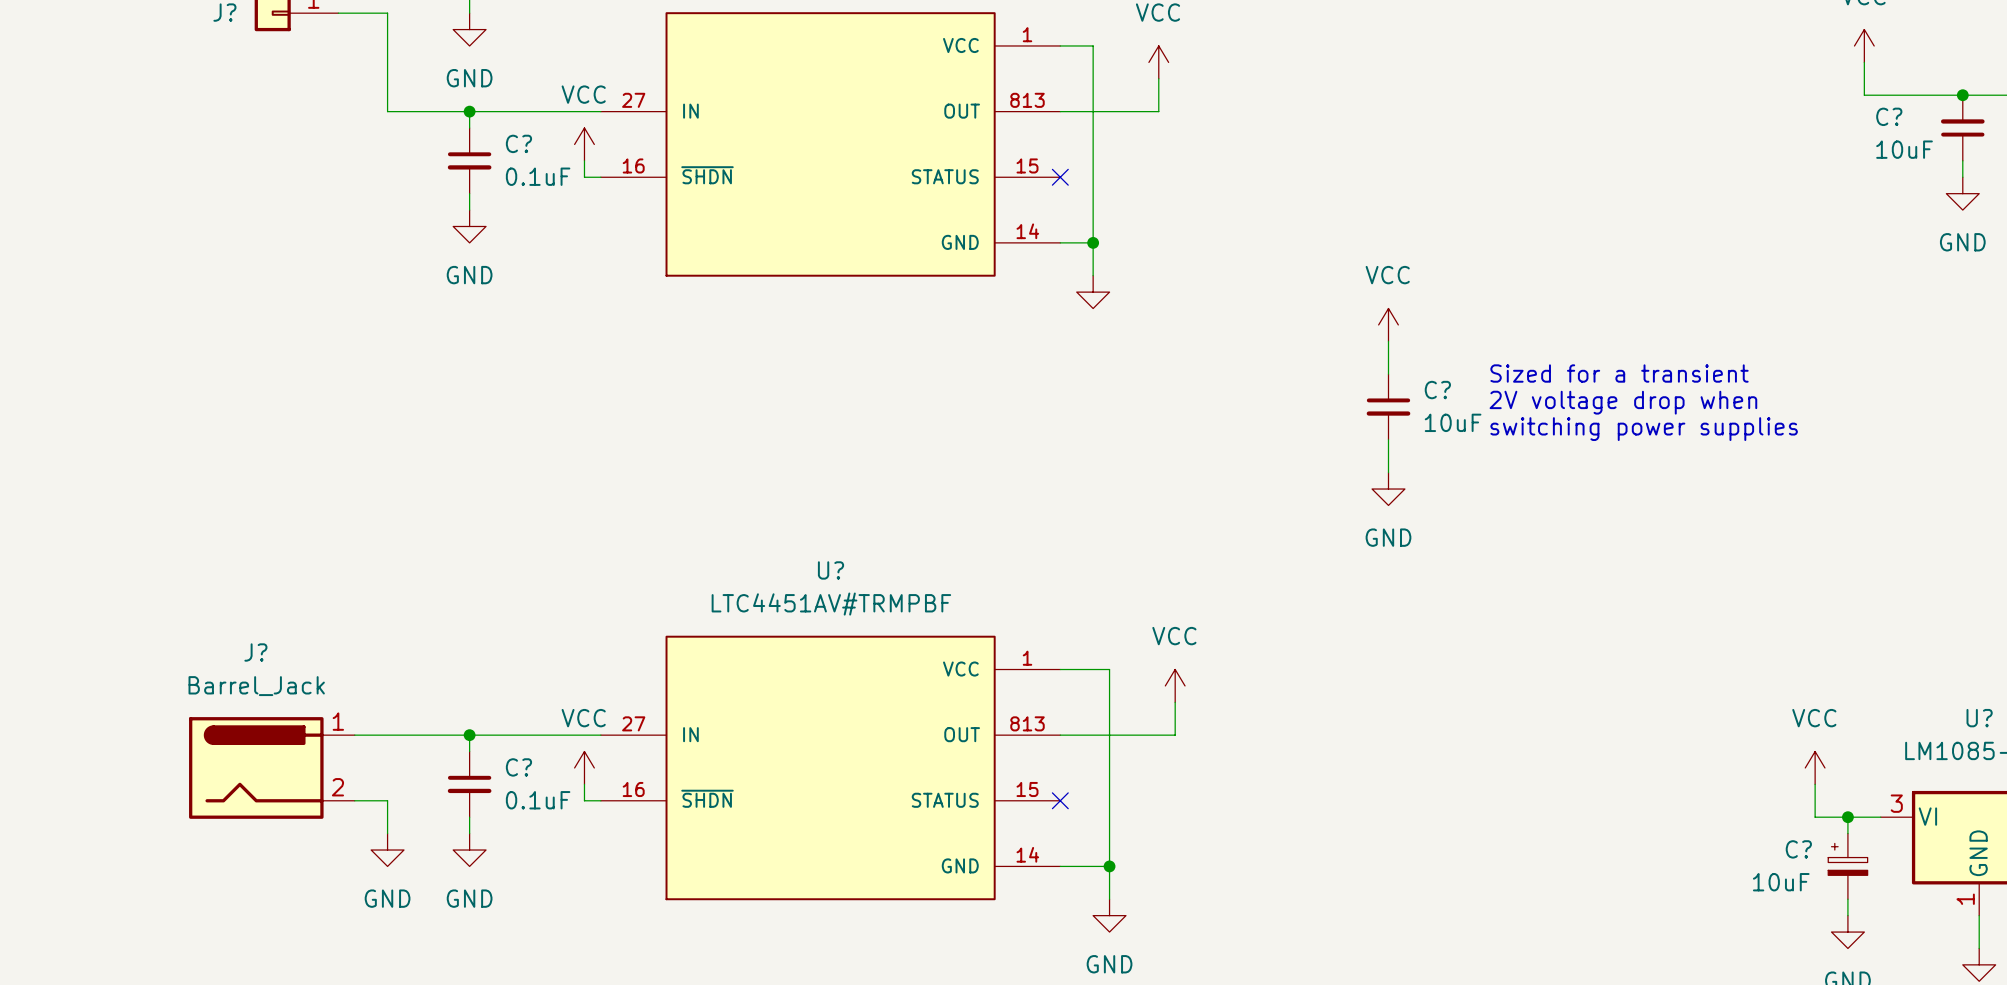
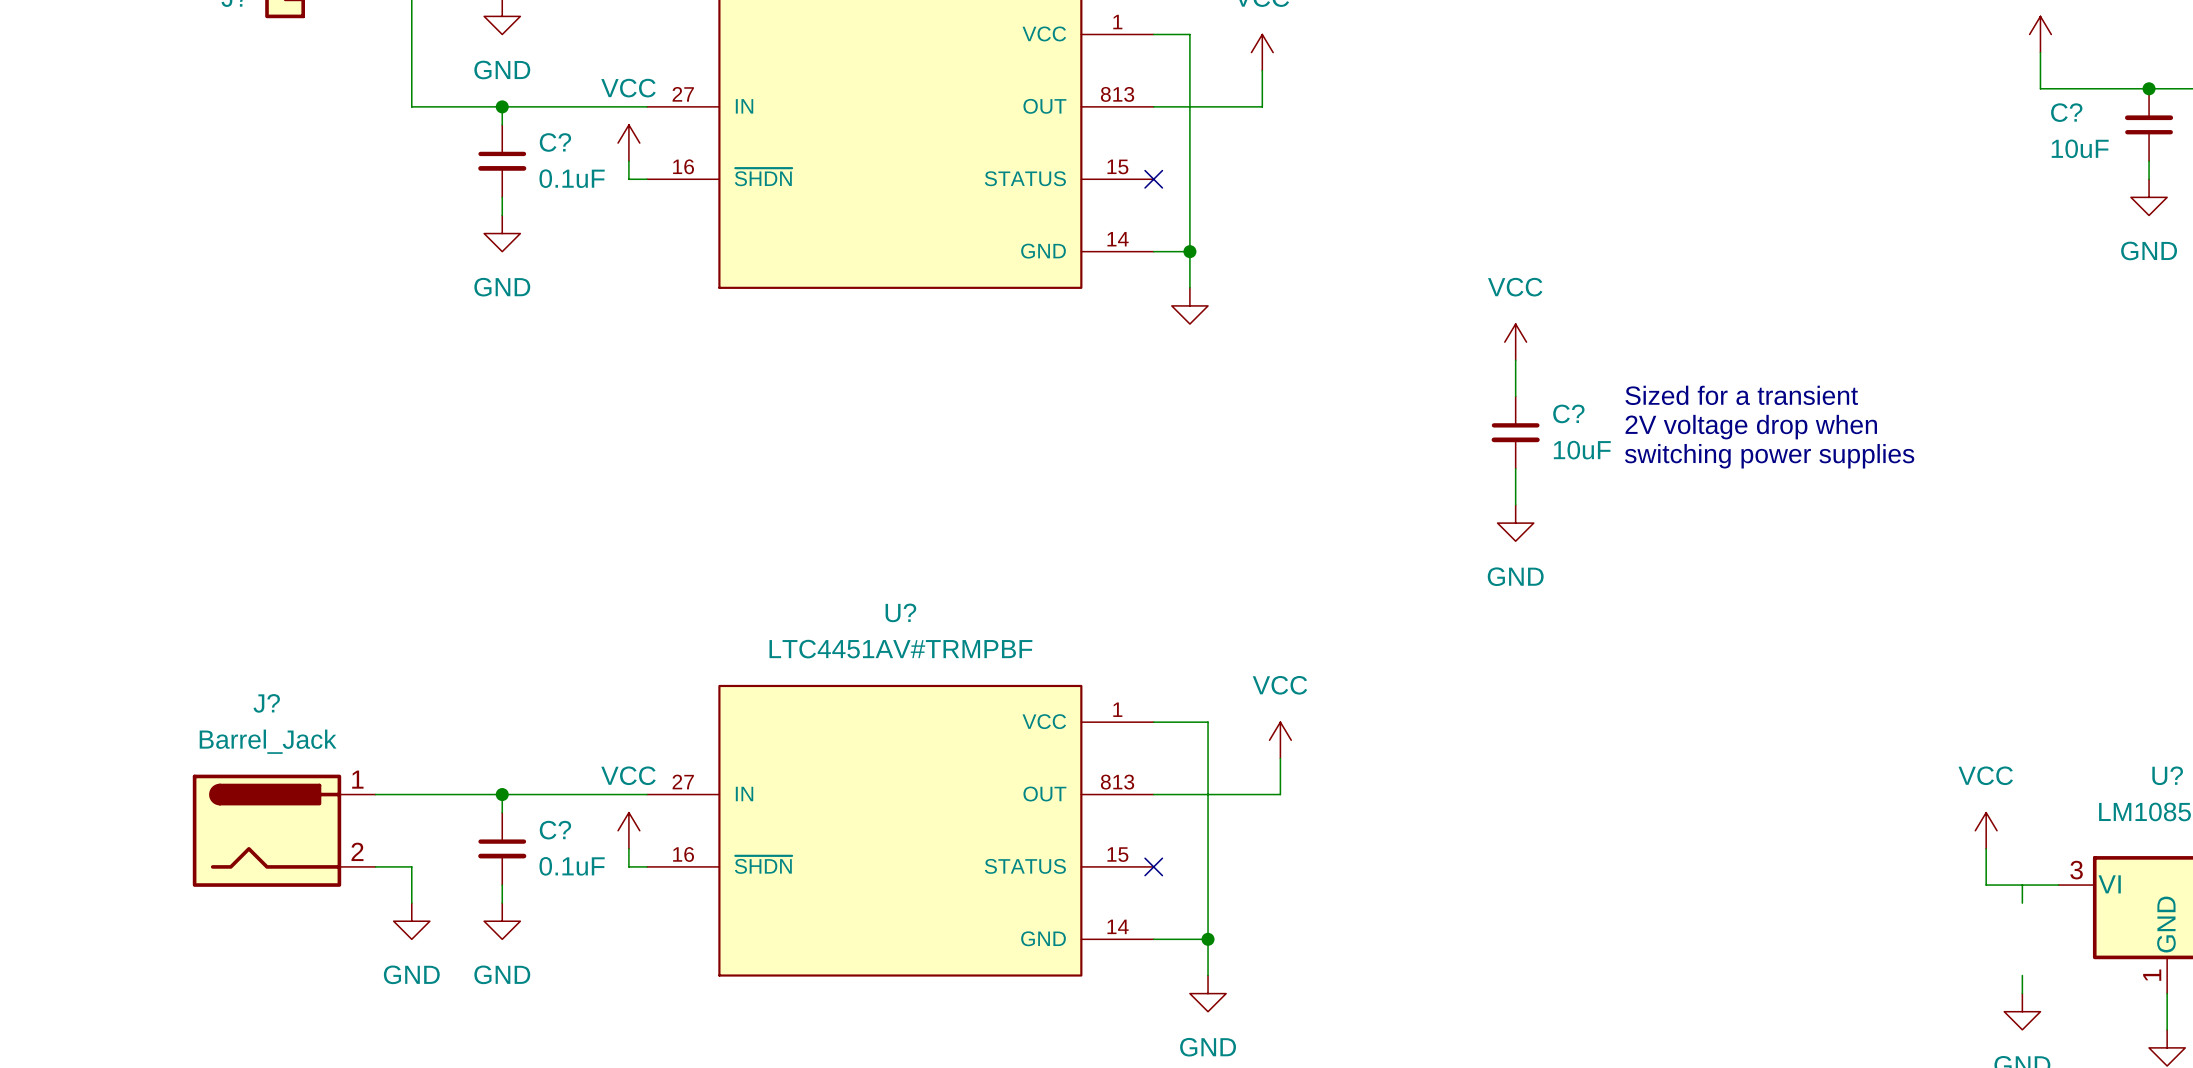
junction: (1847, 817) -> none
C?: 10uF (1847, 866) -> none

